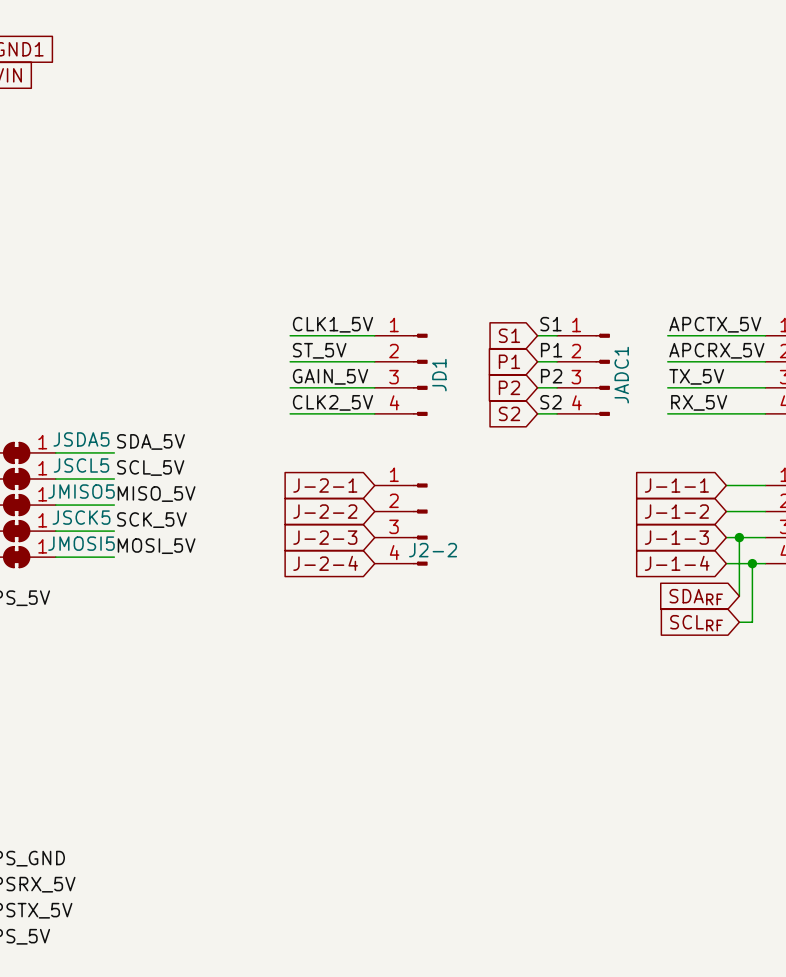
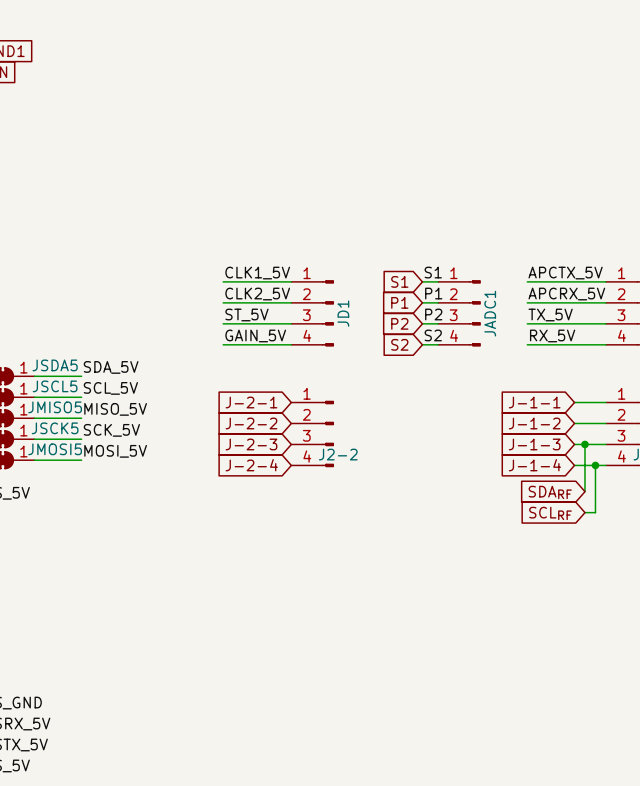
label: ST_5V (319, 350) -> CLK2_5V (257, 294)
label: GAIN_5V (330, 376) -> ST_5V (246, 315)
label: CLK2_5V (333, 402) -> GAIN_5V (255, 335)

